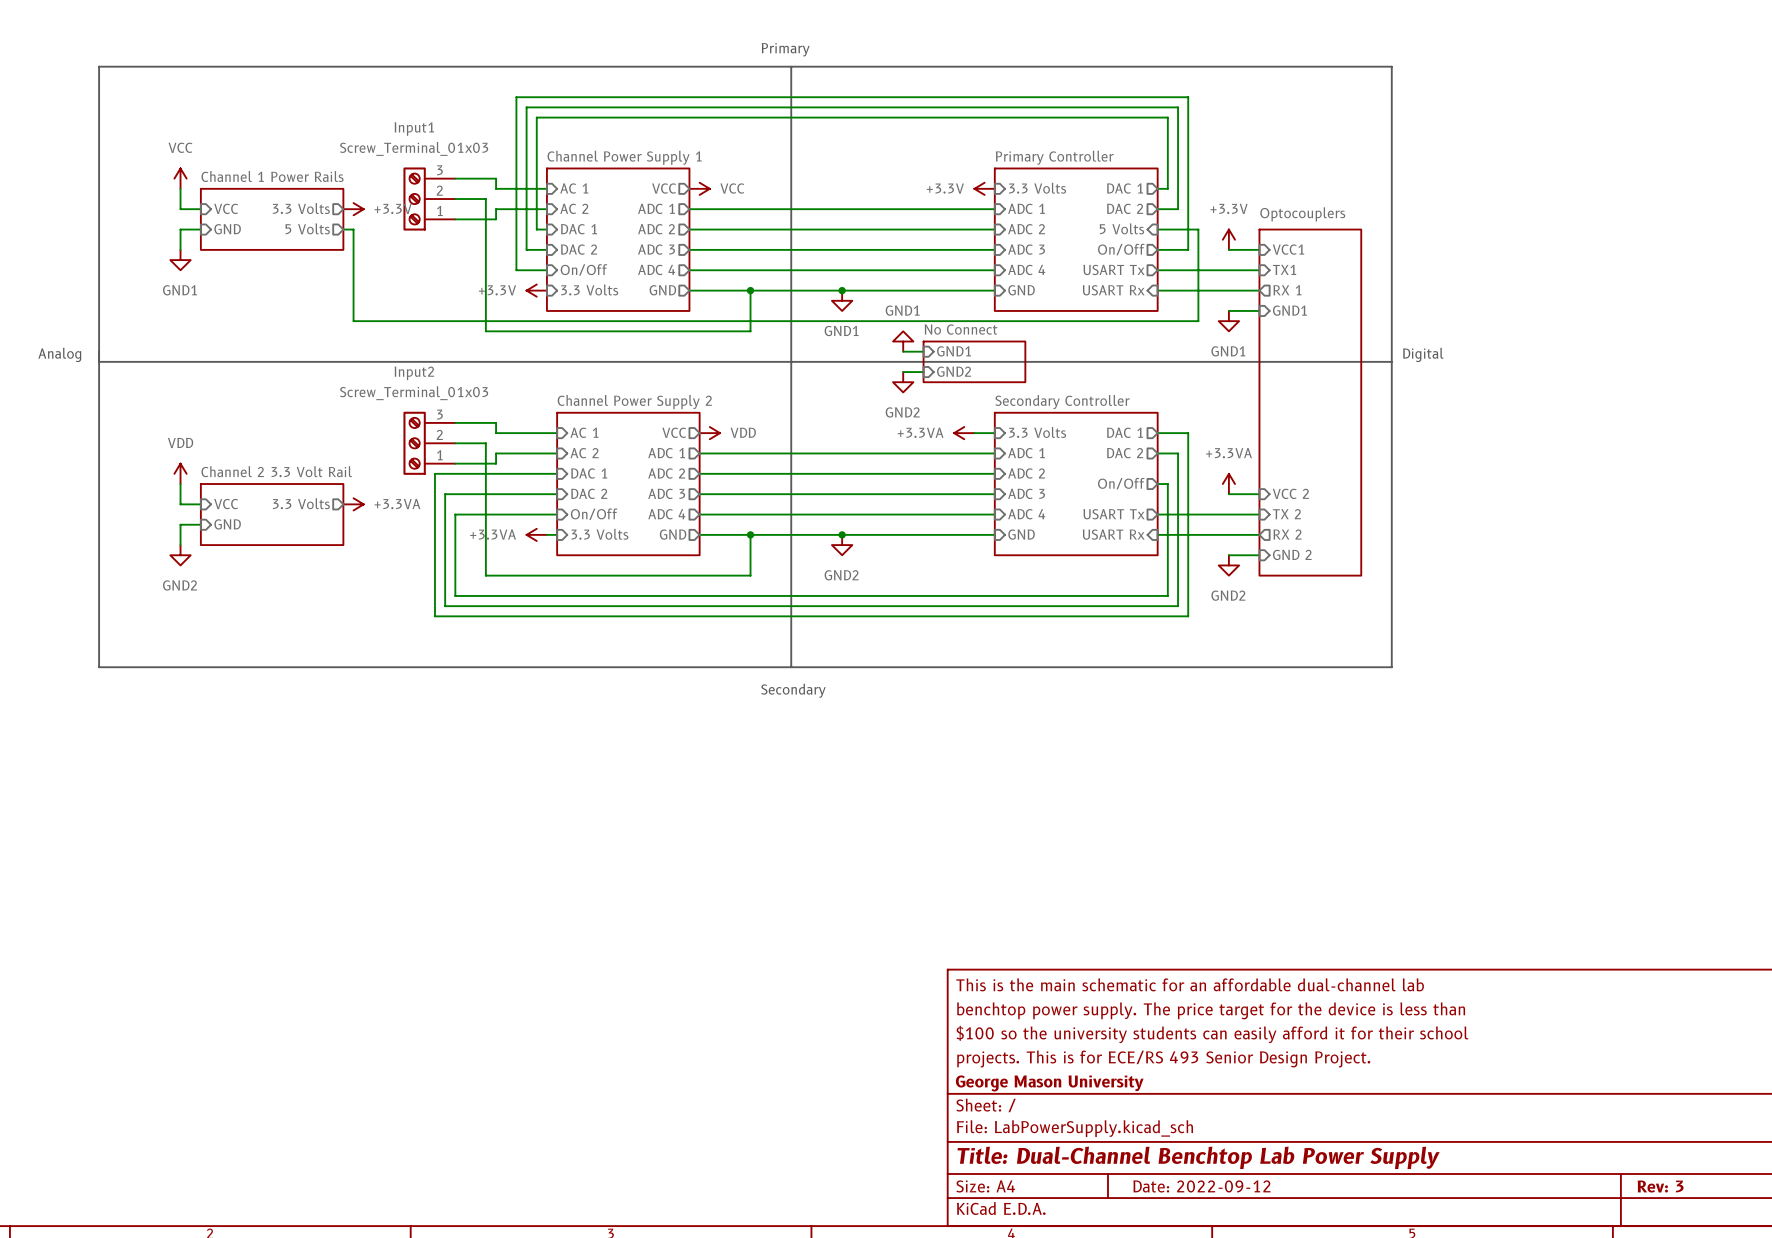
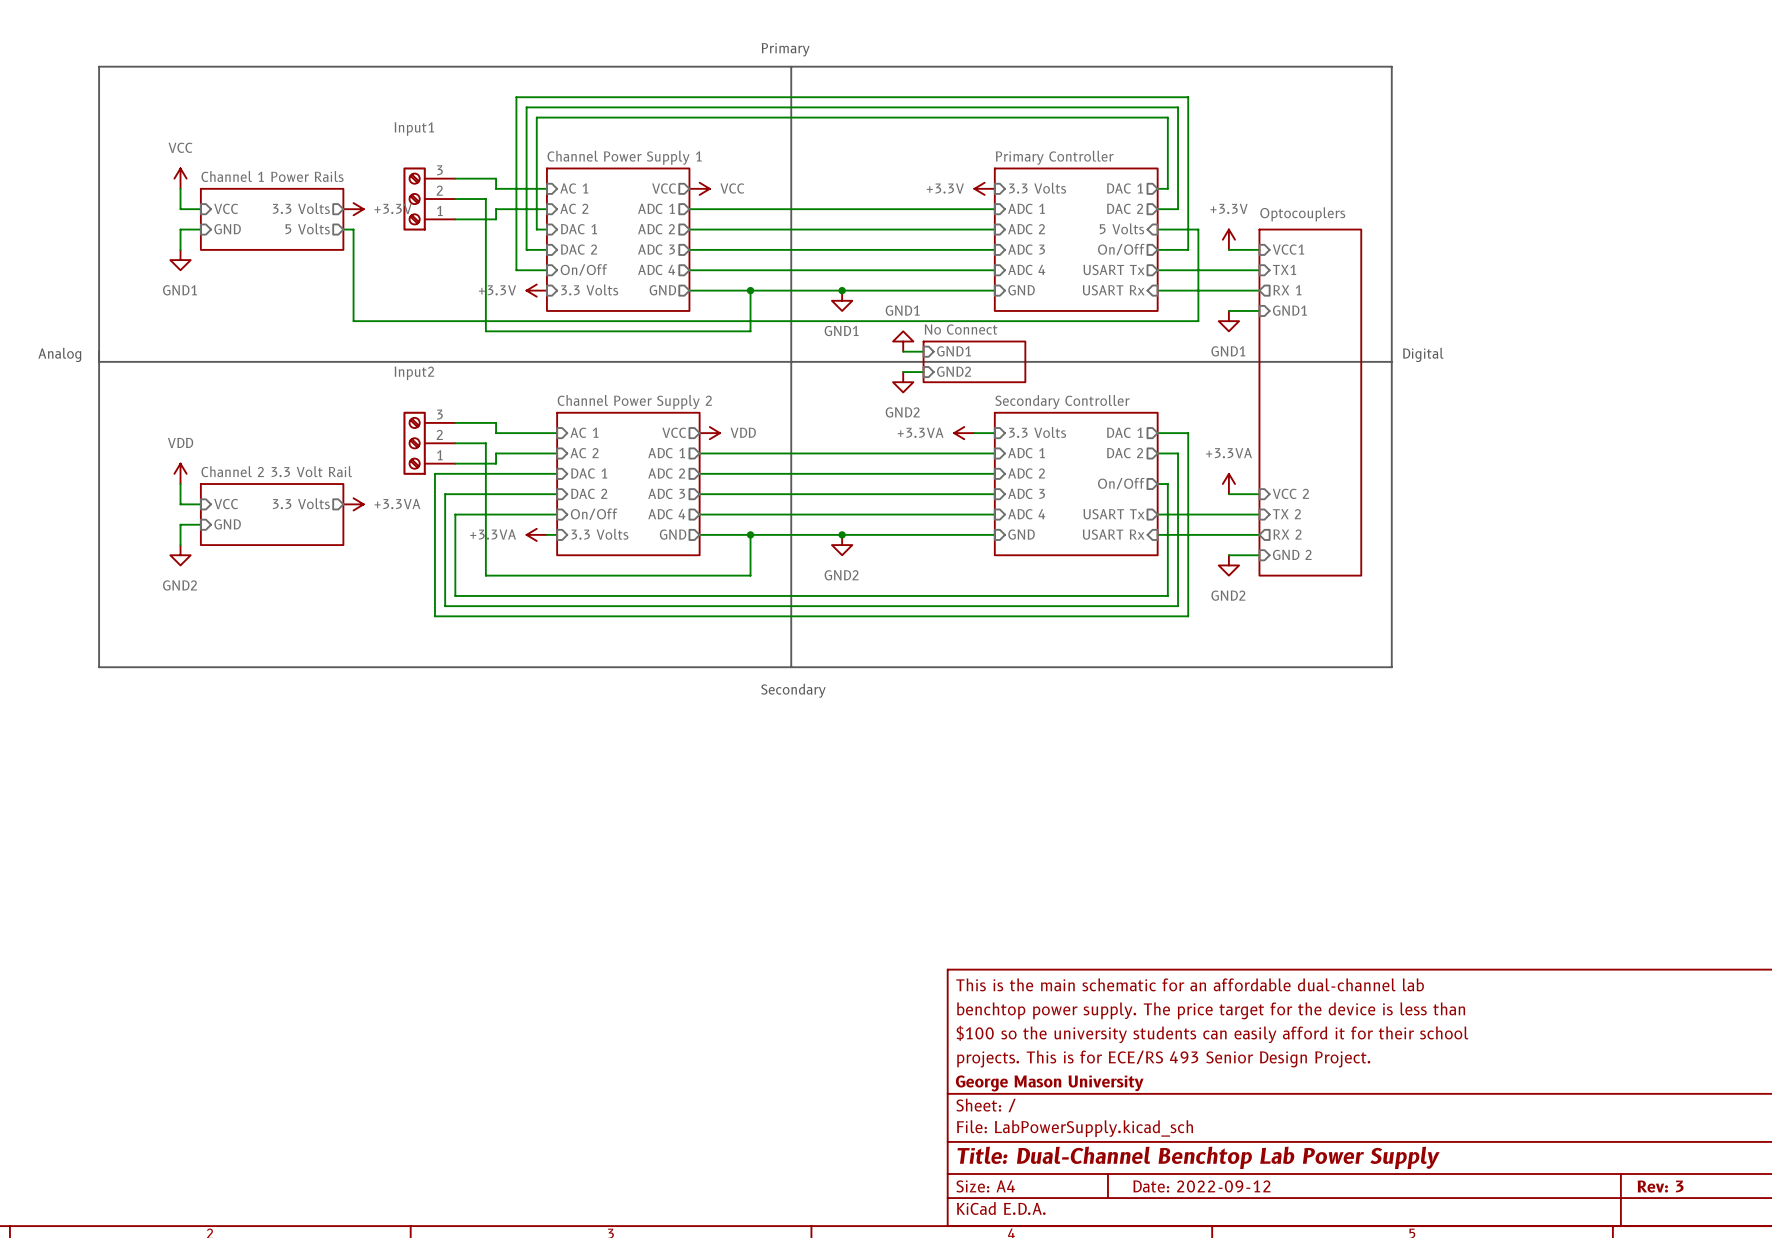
Input1 value: Screw_Terminal_01x03 (414, 148) -> none
Input2 value: Screw_Terminal_01x03 (414, 393) -> none

